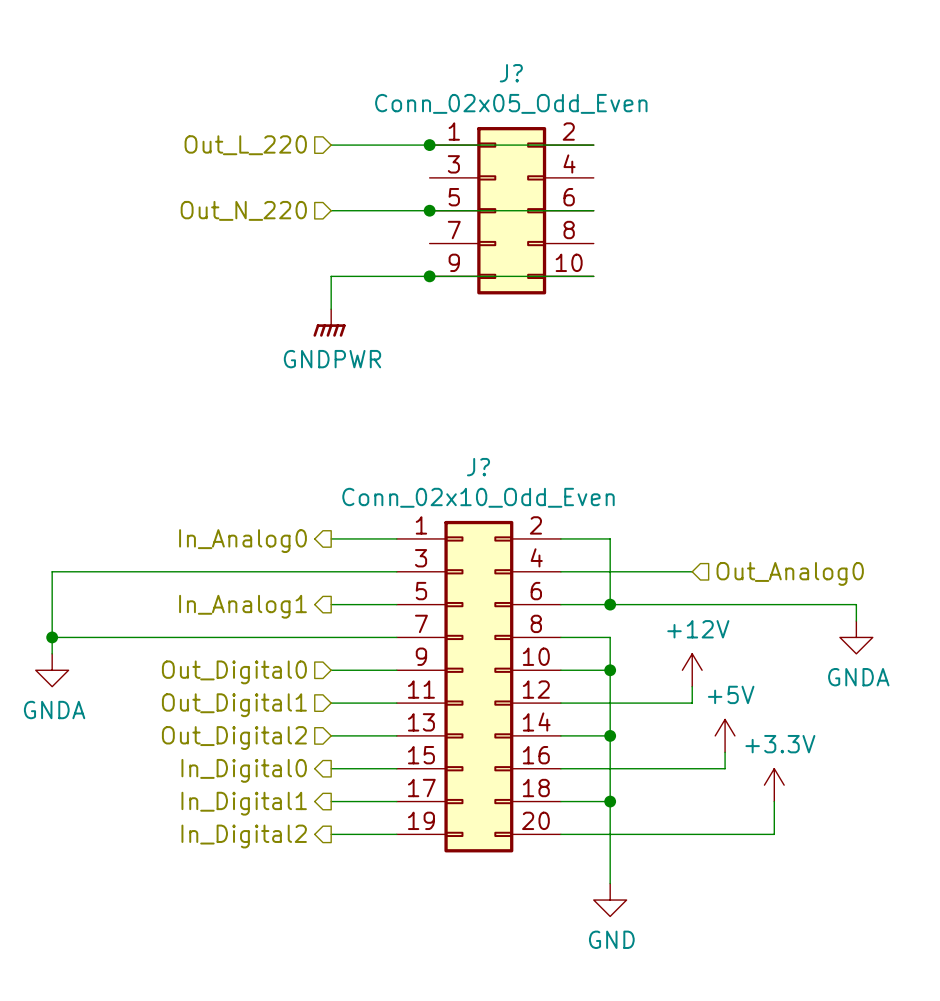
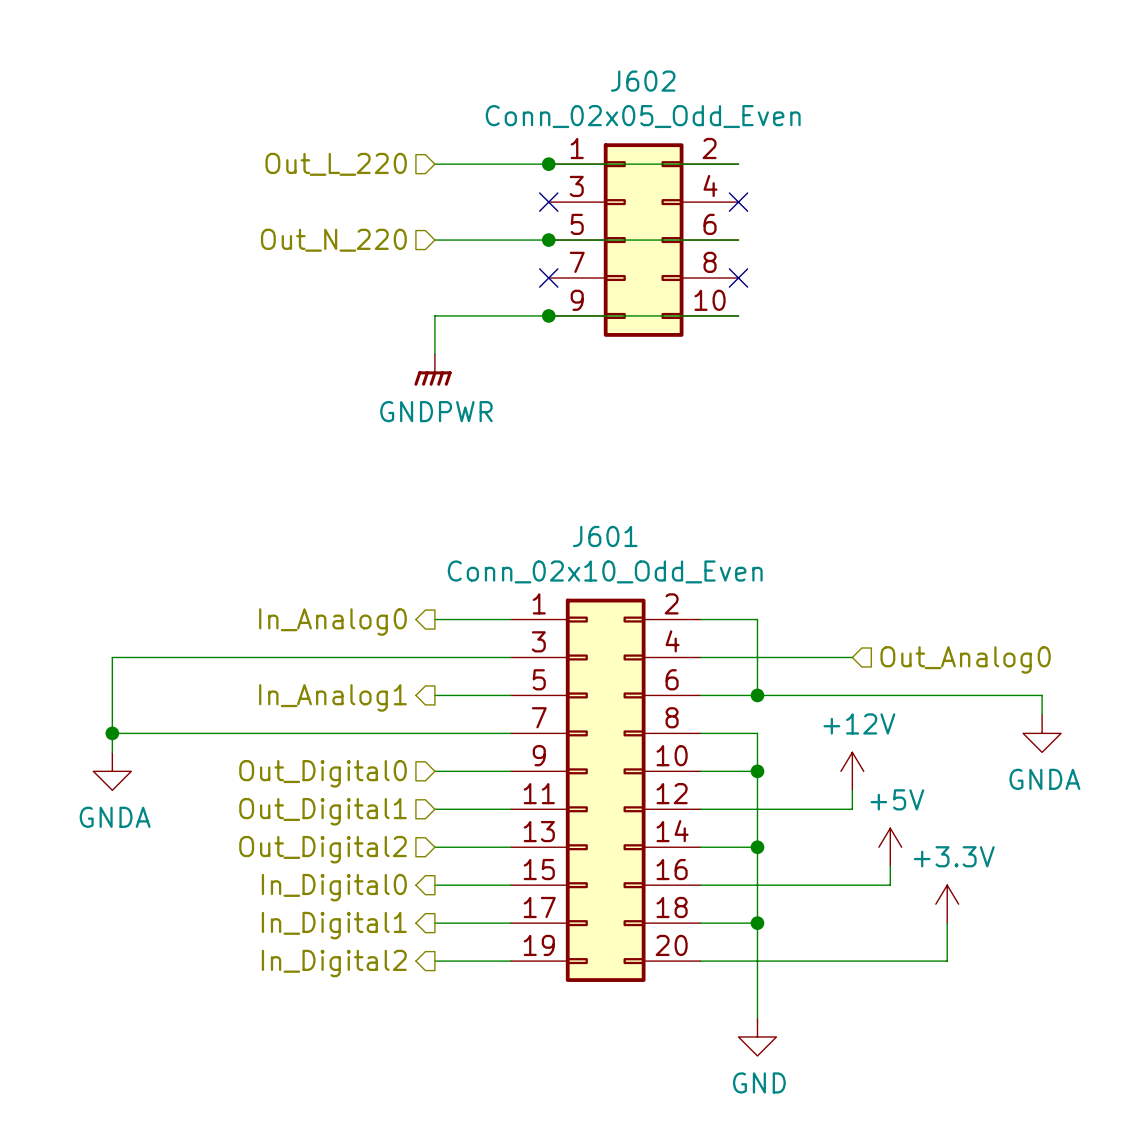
J? name: J? (511, 73) -> J602 (643, 81)
no-connect mark: none -> (548, 202)
no-connect mark: none -> (738, 202)
no-connect mark: none -> (548, 278)
no-connect mark: none -> (738, 278)
J? name: J? (478, 467) -> J601 (605, 536)

